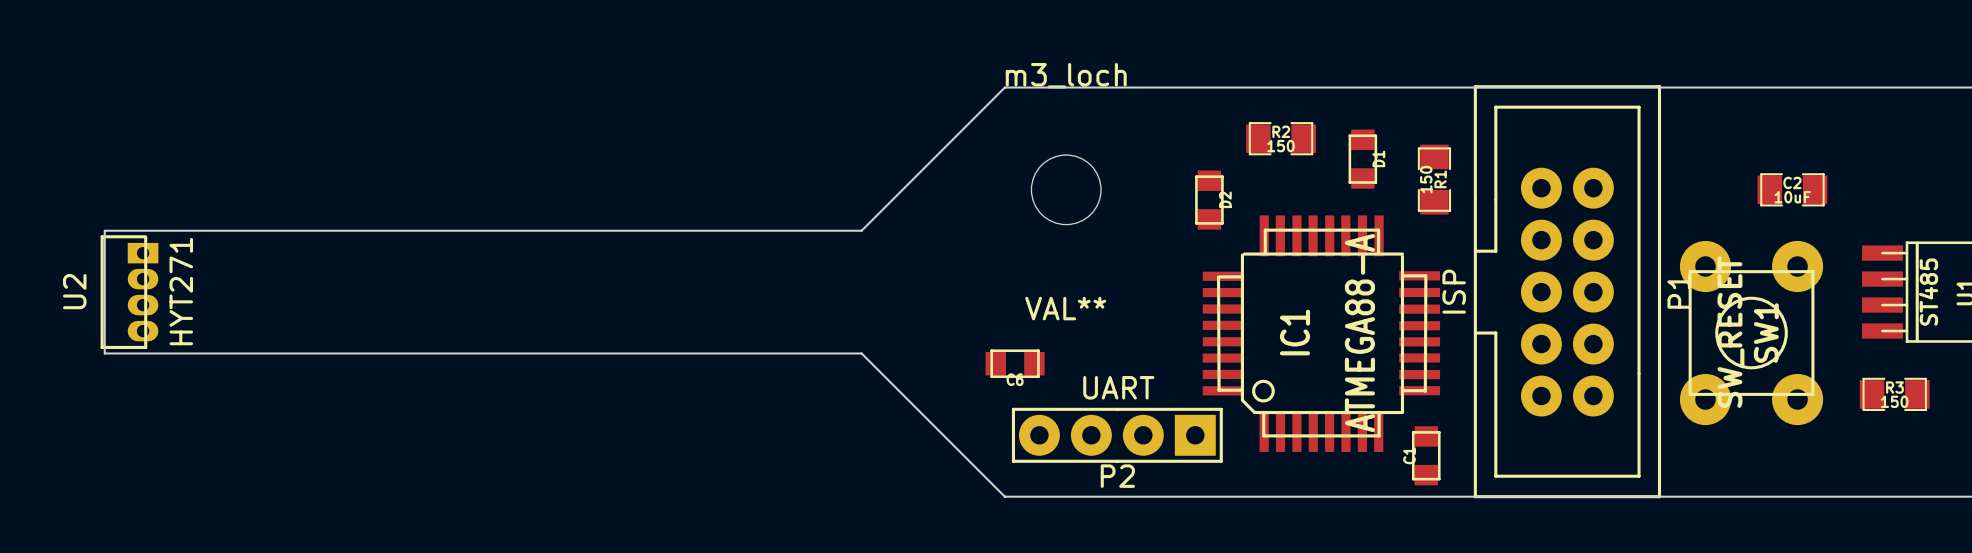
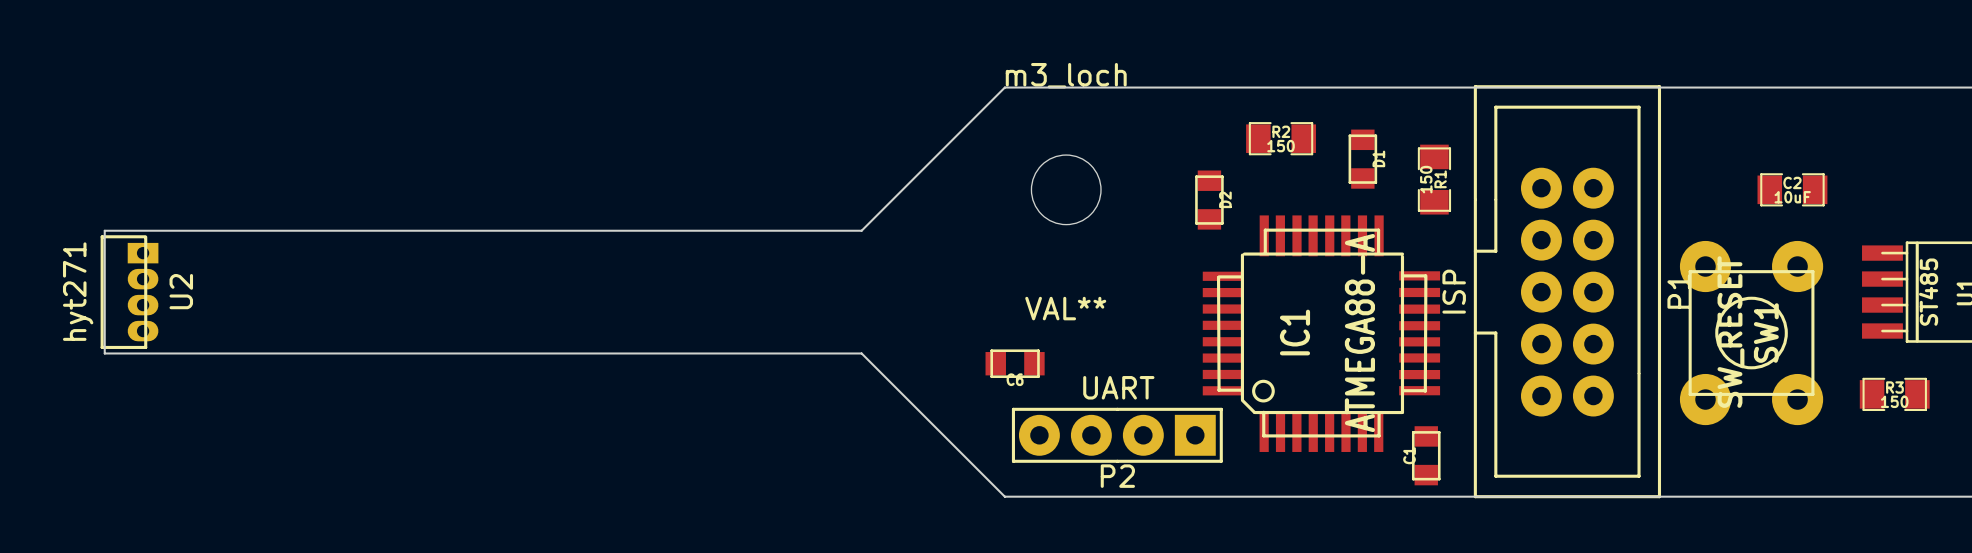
U2 name: U2 (74, 291) -> hyt271 (78, 291)
U2 value: HYT271 (181, 291) -> U2 (181, 291)

